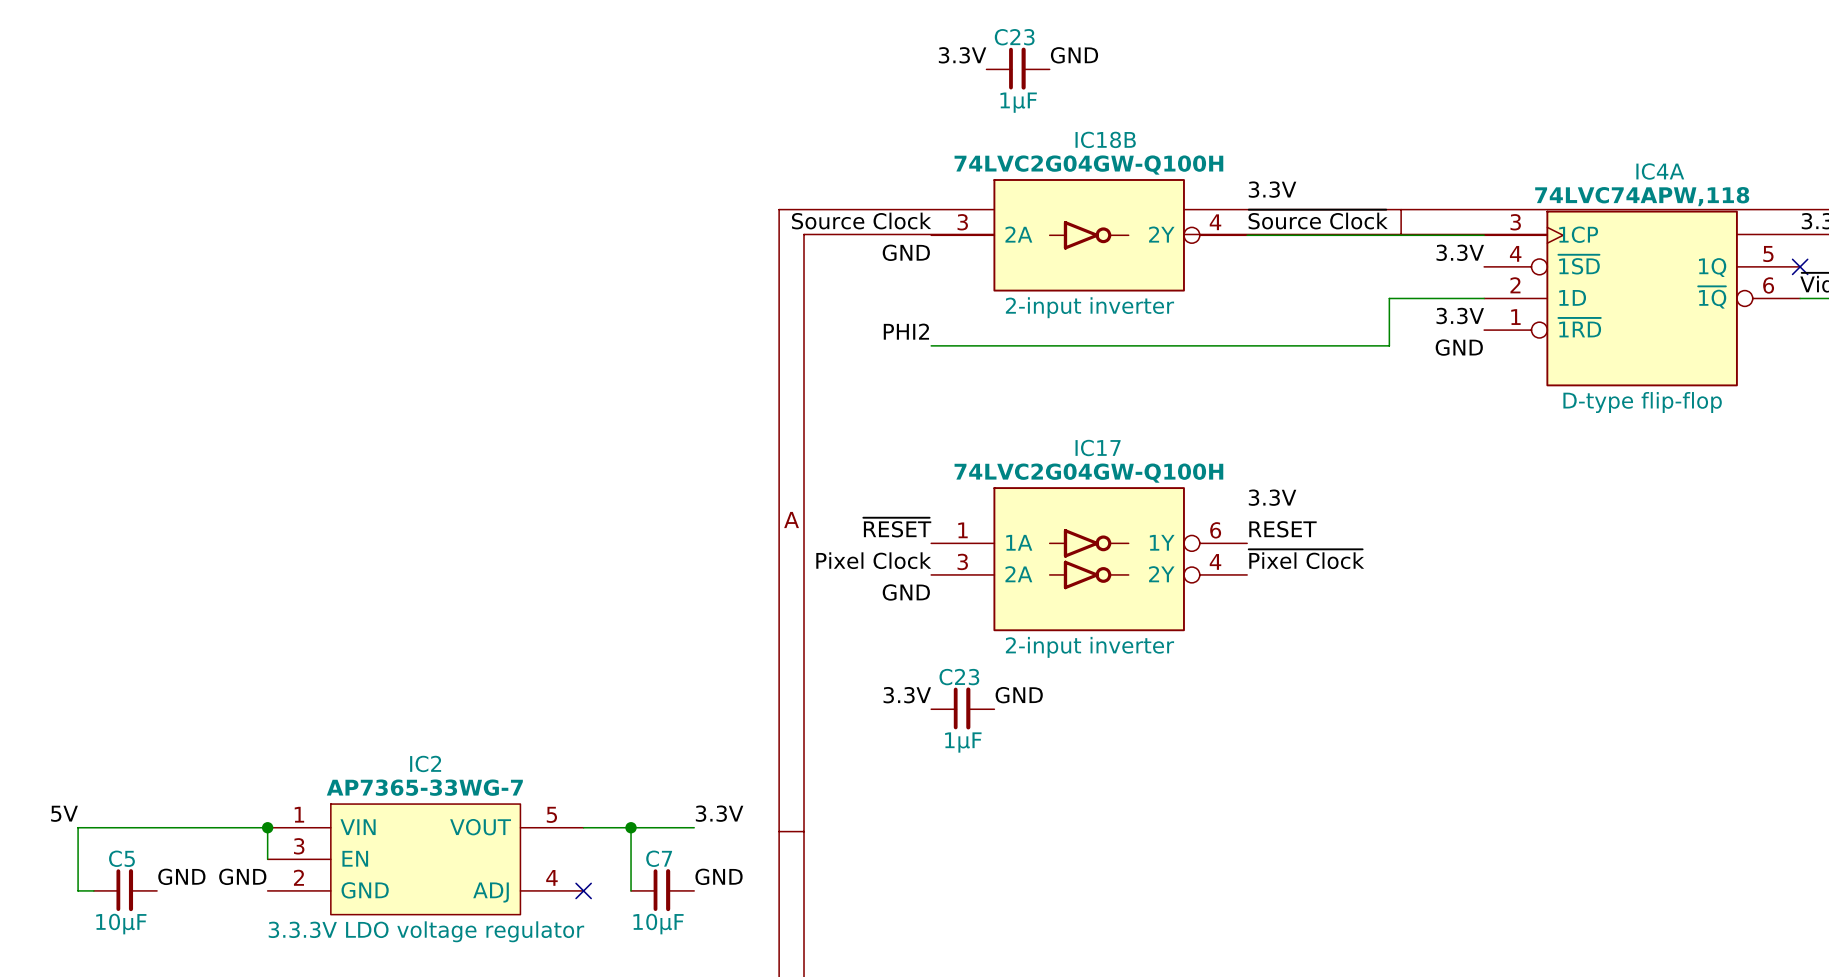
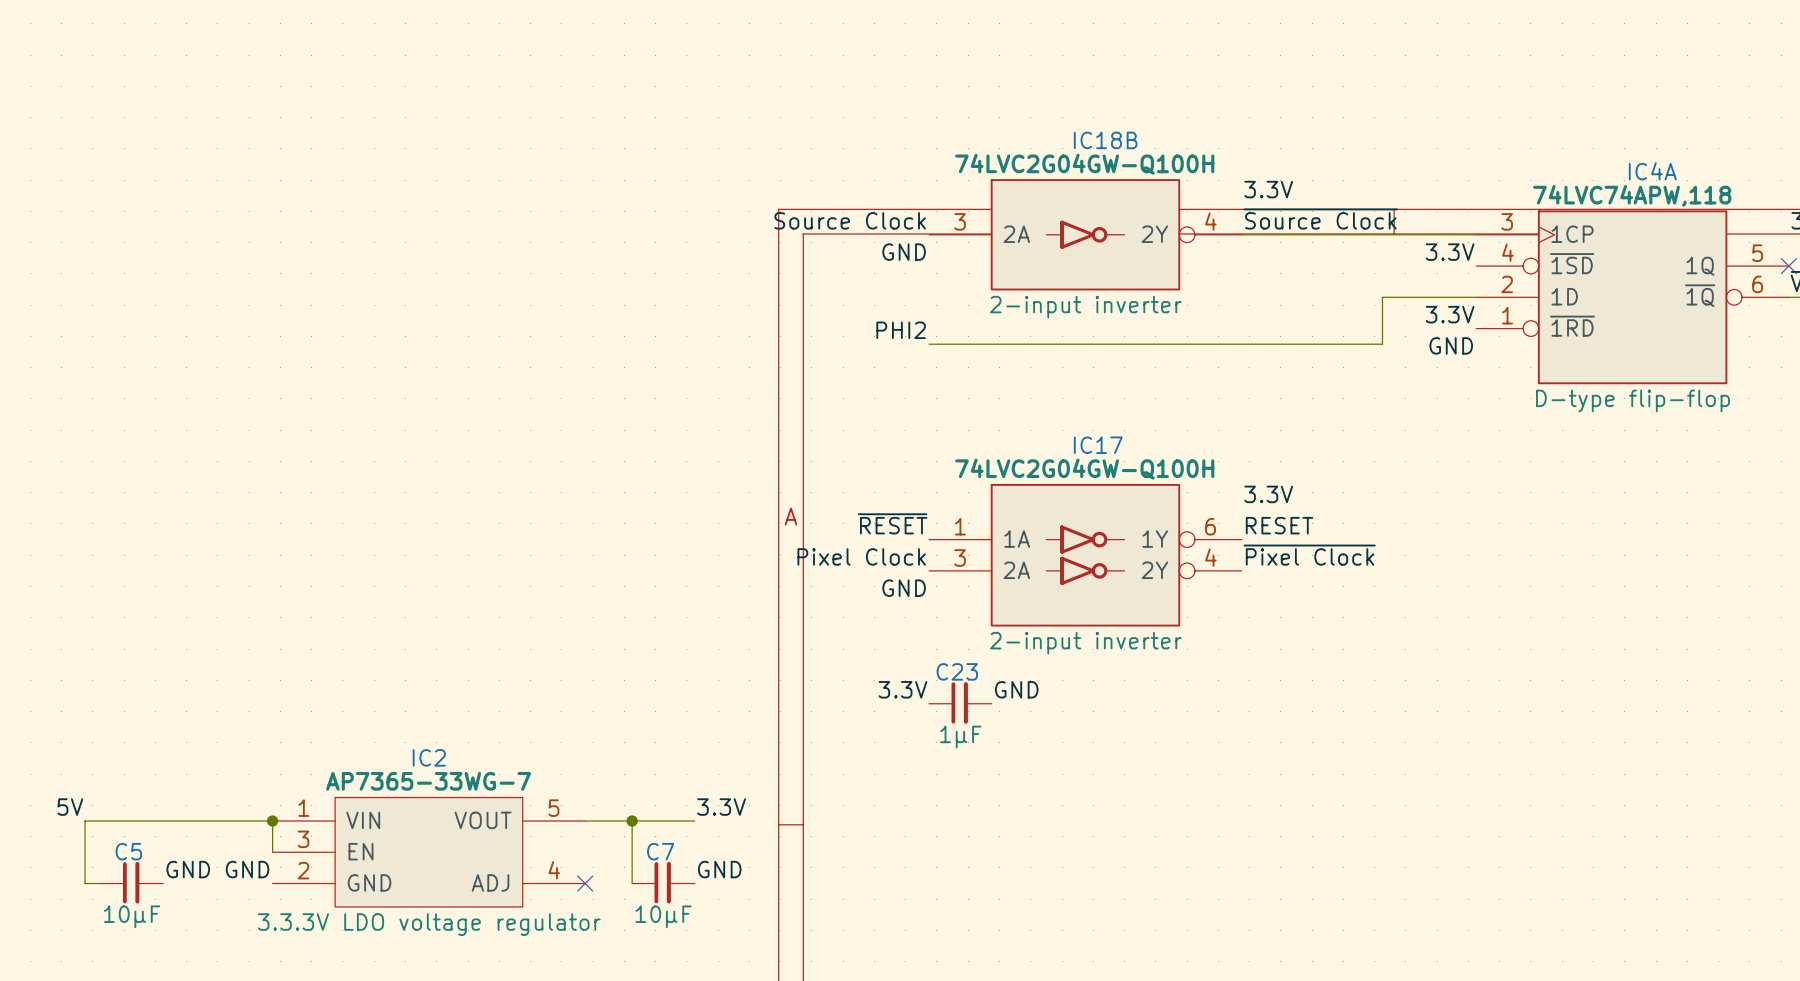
label: 3.3V (962, 55) -> none
label: GND (1074, 55) -> none
C23: 1μF (1018, 68) -> none

